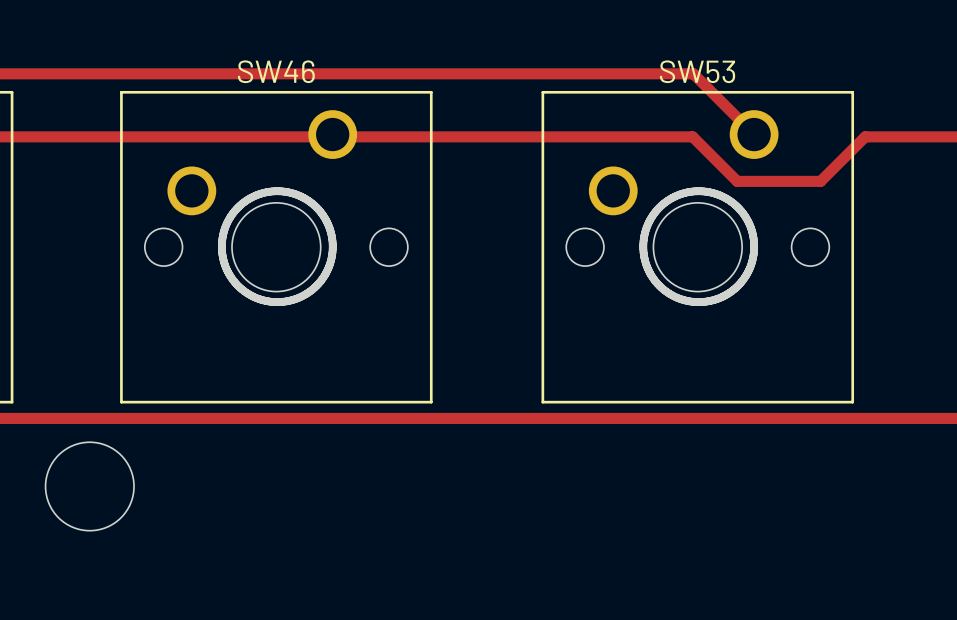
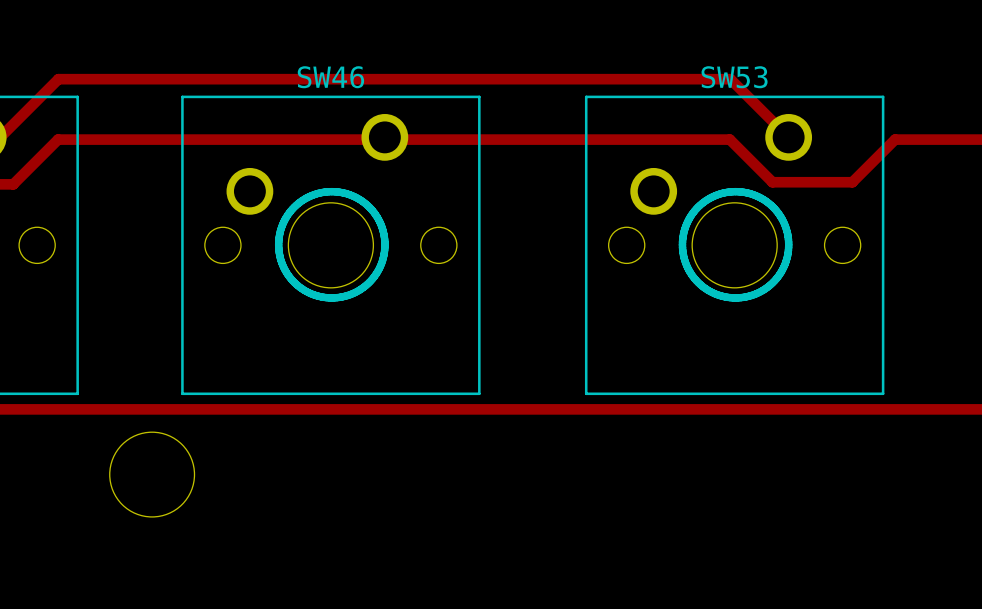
board edge: (277, 191) (255, 195) (238, 207) (226, 225) (221, 246) (226, 268) (238, 285) (255, 297) (277, 302) (298, 297) (316, 285) (328, 268) (332, 246) (328, 225) (316, 207) (298, 195) (277, 191) -> none
line: none -> (331, 191) (352, 195) (369, 207) (380, 224) (384, 244) (380, 265) (369, 282) (352, 293) (331, 297) (311, 293) (294, 282) (282, 265) (278, 244) (282, 224) (294, 207) (311, 195) (331, 191)
board edge: (698, 191) (677, 195) (659, 207) (647, 225) (643, 246) (647, 268) (659, 285) (677, 297) (698, 302) (720, 297) (737, 285) (749, 268) (754, 246) (749, 225) (737, 207) (720, 195) (698, 191) -> none
line: none -> (735, 191) (756, 195) (773, 207) (784, 224) (788, 244) (784, 265) (773, 282) (756, 293) (735, 297) (714, 293) (698, 282) (686, 265) (682, 244) (686, 224) (698, 207) (714, 195) (735, 191)

